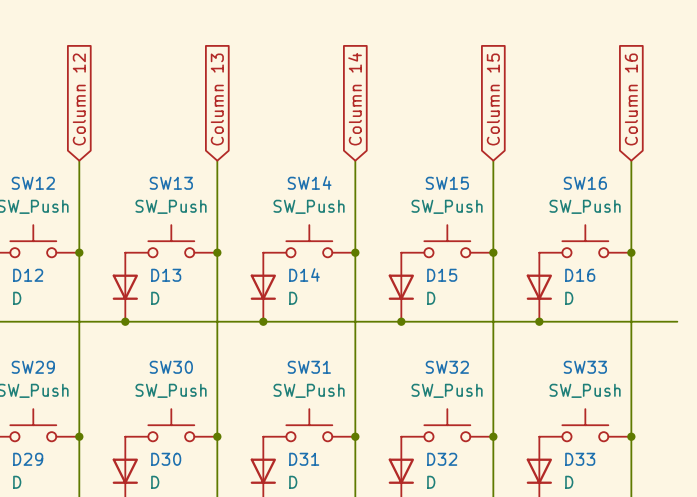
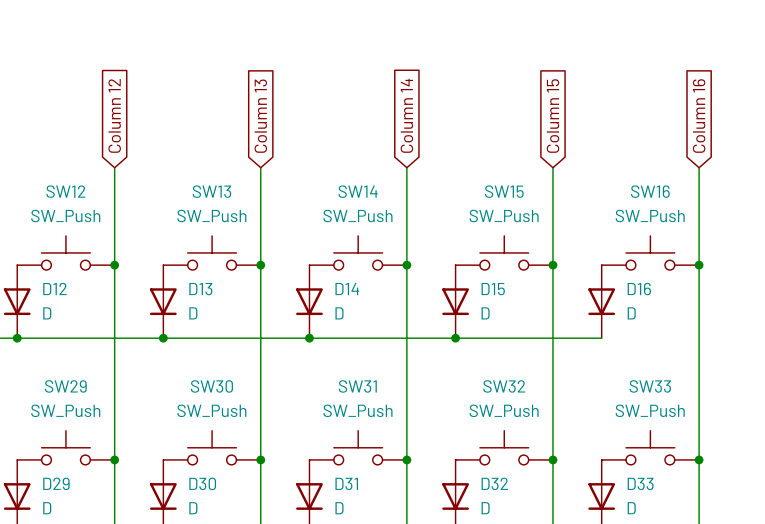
wire: (539, 321) (677, 321) -> none
junction: (539, 321) -> none

